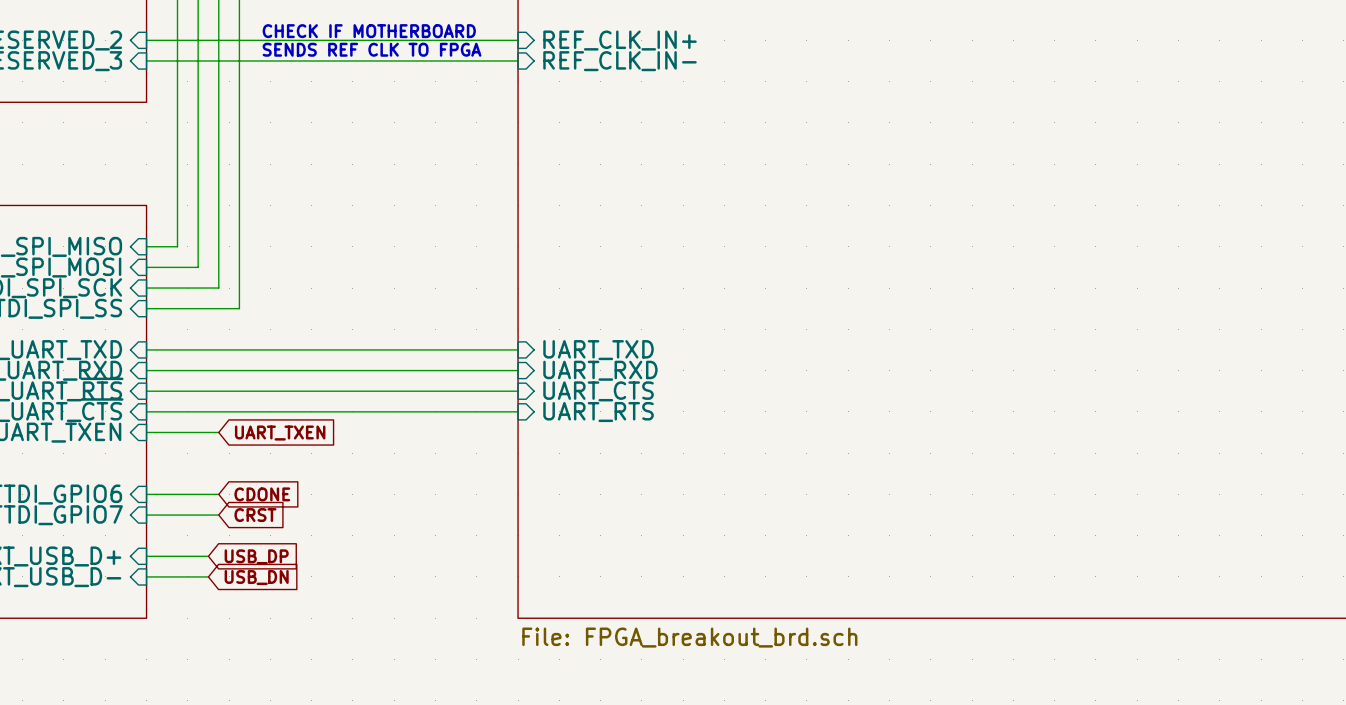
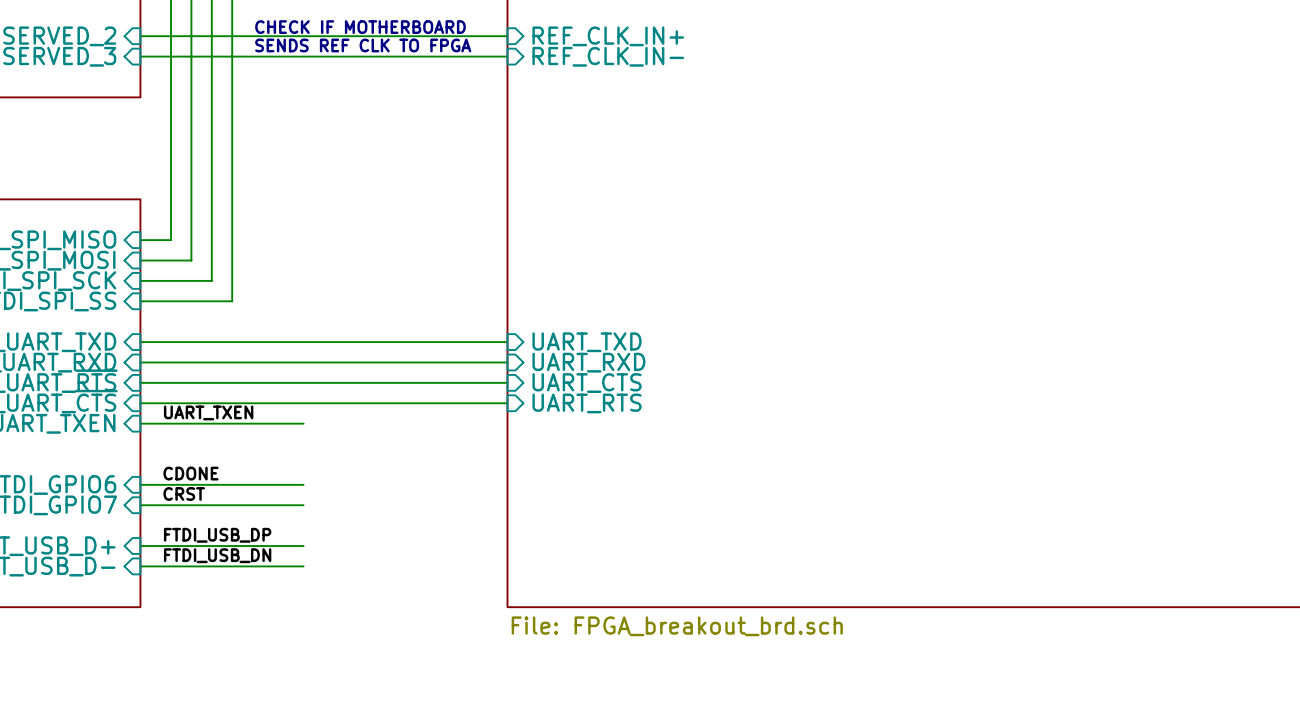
label: none -> UART_TXEN (208, 412)
wire: none -> (211, 423) (303, 423)
global label: UART_TXEN (280, 433) -> none
label: none -> CDONE (190, 473)
wire: none -> (211, 484) (303, 484)
global label: CDONE (262, 494) -> none
label: none -> CRST (184, 493)
wire: none -> (211, 505) (303, 505)
global label: CRST (255, 515) -> none
label: none -> FTDI_USB_DP (217, 535)
wire: none -> (201, 546) (303, 546)
global label: USB_DP (256, 556) -> none
label: none -> FTDI_USB_DN (217, 555)
wire: none -> (201, 566) (303, 566)
global label: USB_DN (256, 577) -> none

